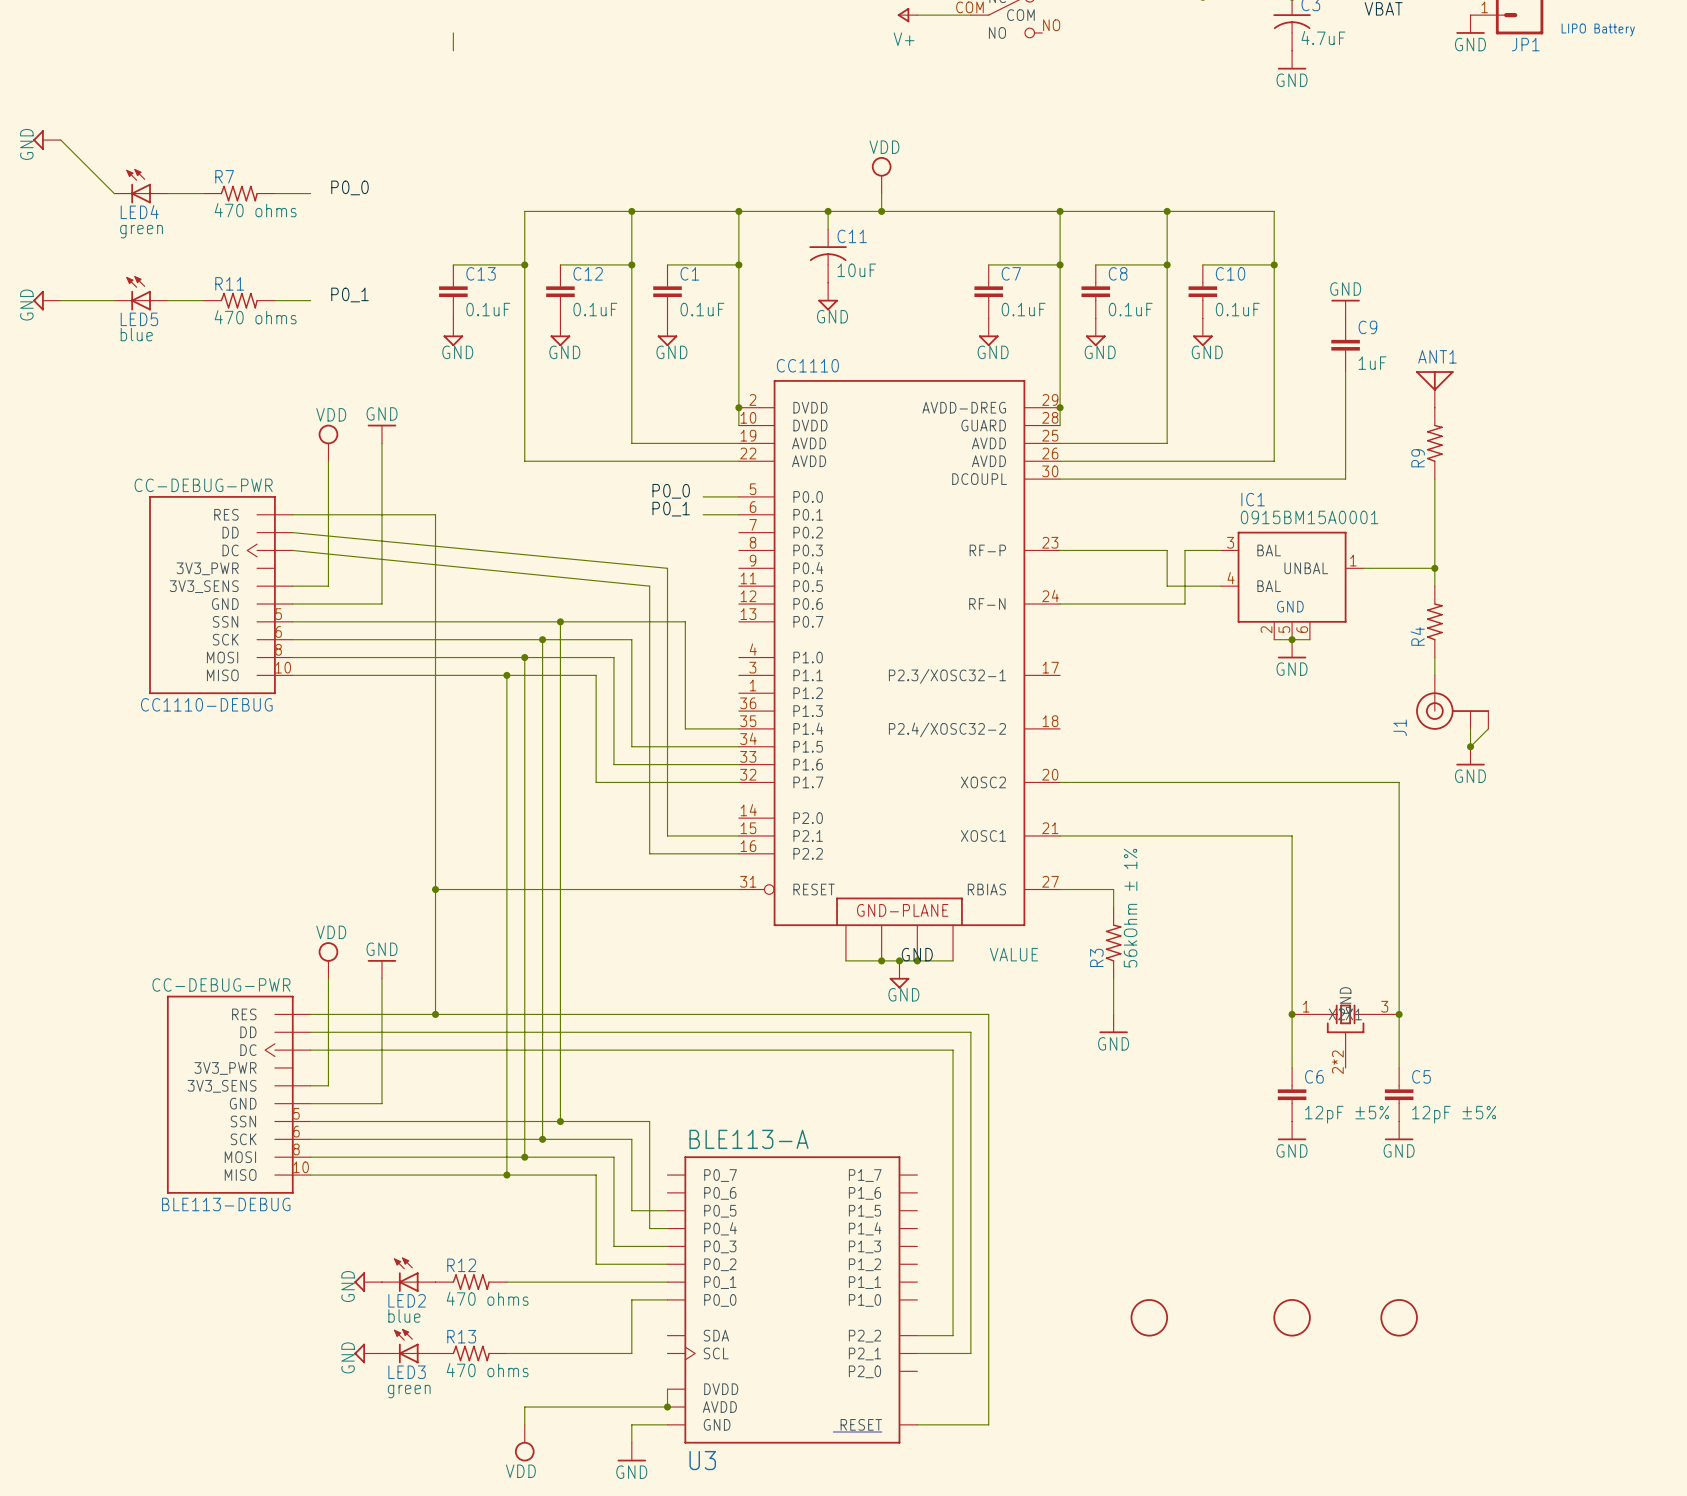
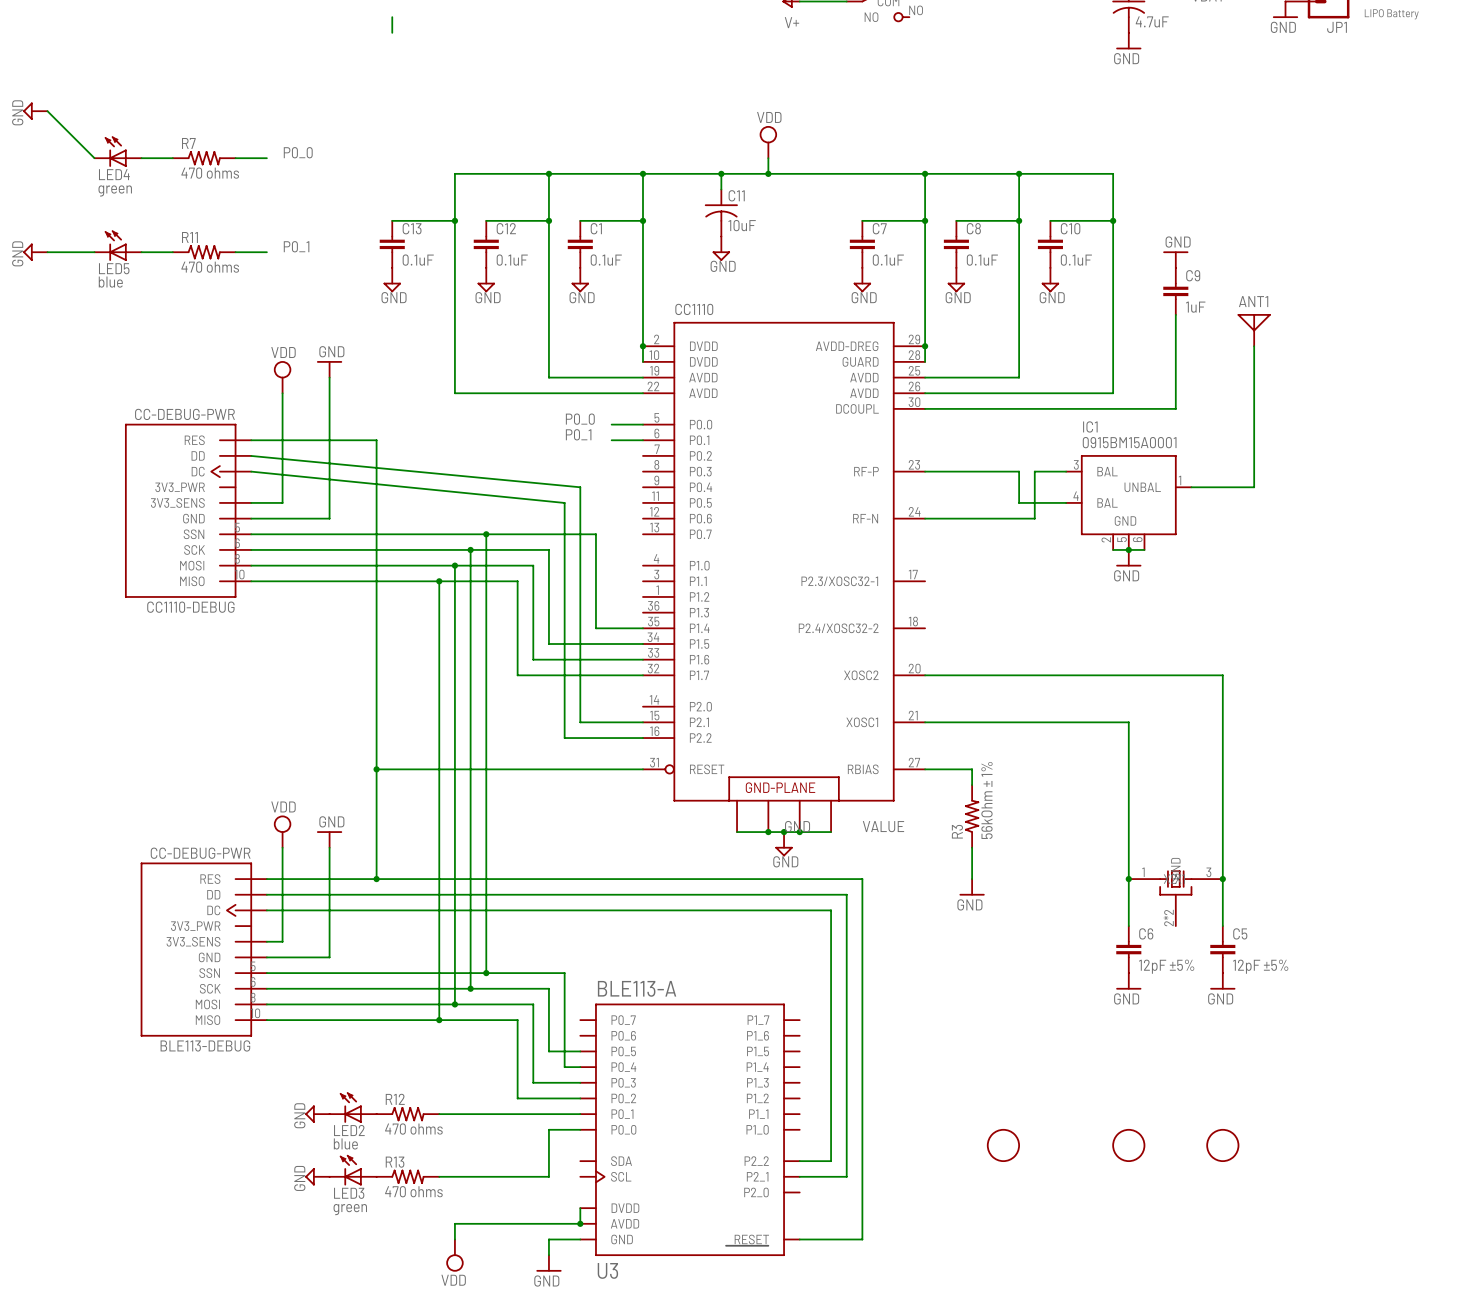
R9: (1434, 443) -> none
wire: (1434, 568) (1434, 586) -> none
junction: (1434, 568) -> none
R4: (1434, 621) -> none
wire: (1434, 657) (1434, 675) -> none
J1: (1452, 702) -> none
wire: (1470, 728) (1470, 746) (1488, 728) -> none
junction: (1470, 746) -> none
power symbol: GND (1470, 756) -> none

